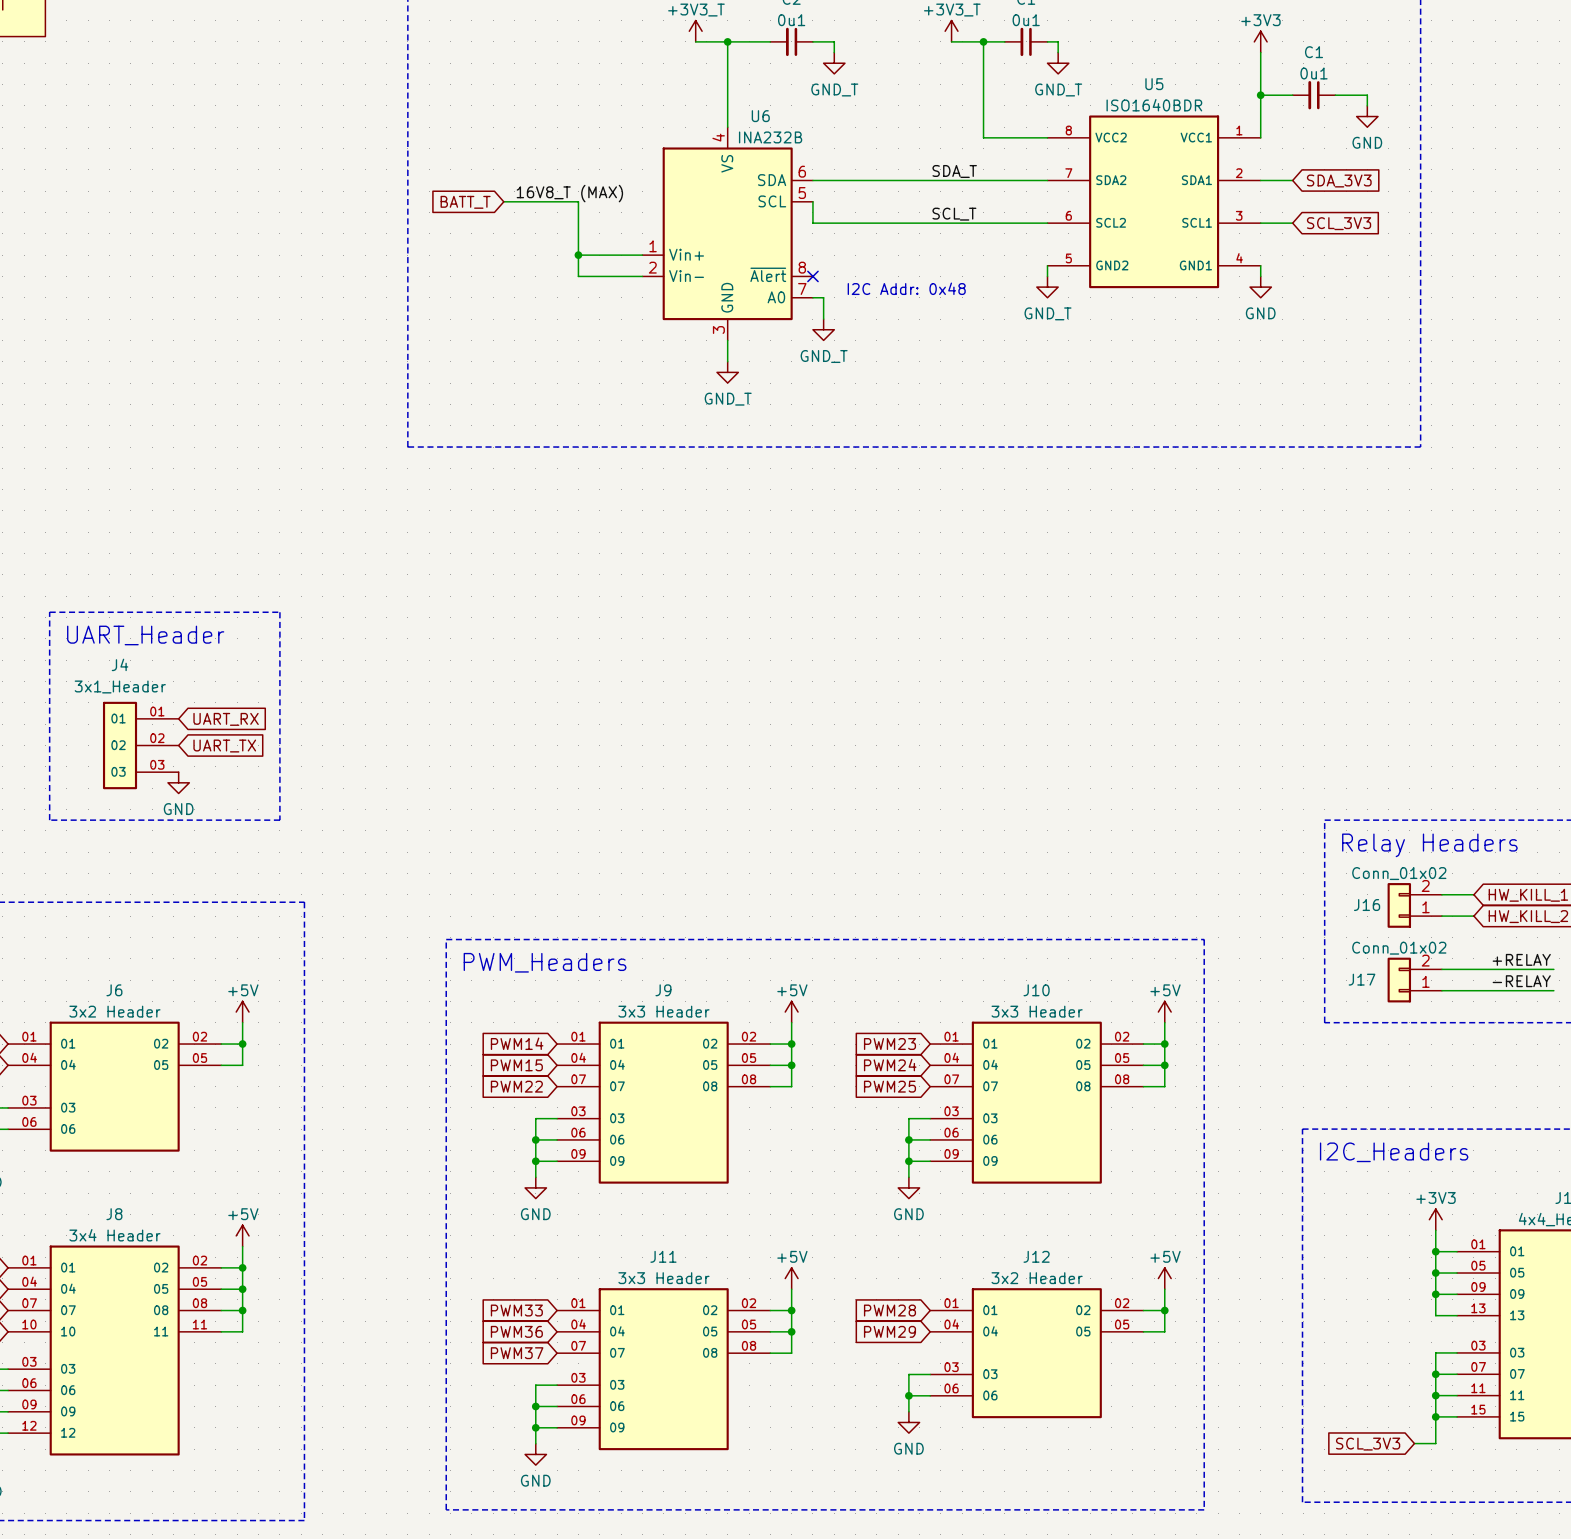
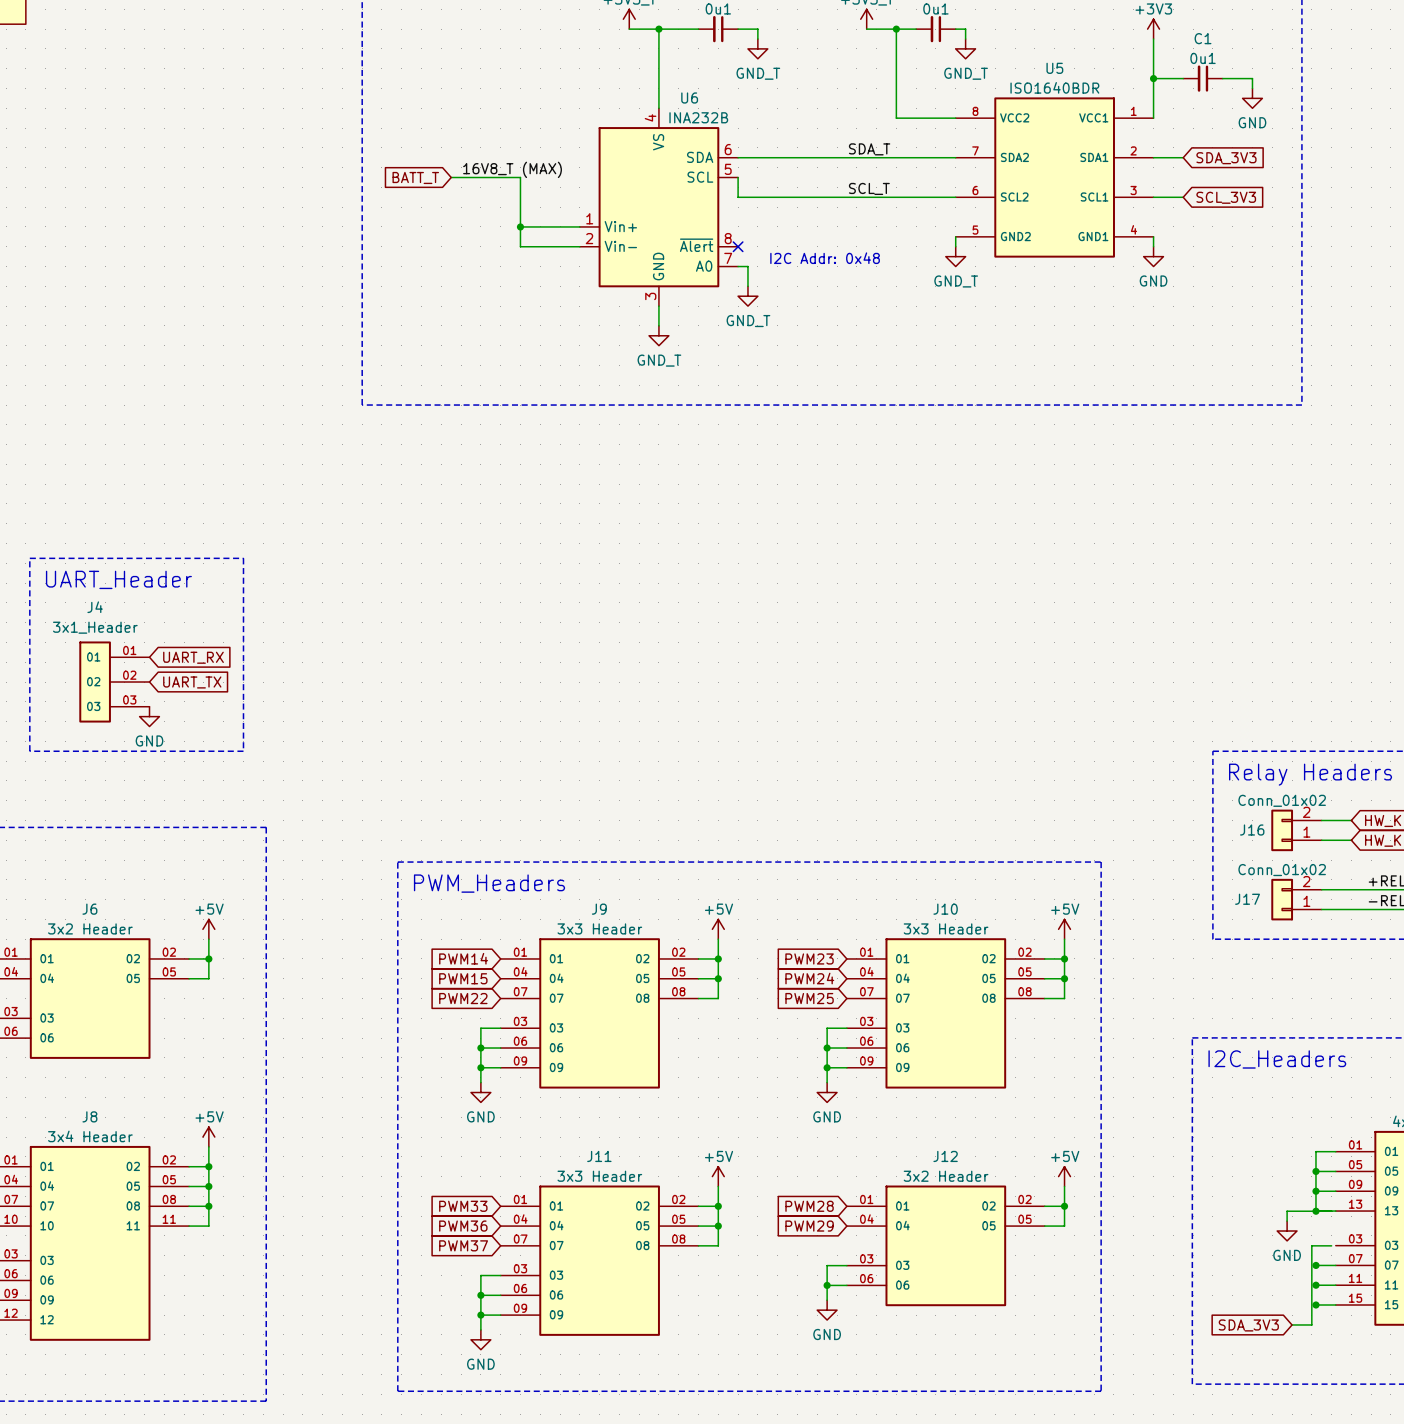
power symbol: +3V3 (1435, 1219) -> none
wire: (1435, 1230) (1435, 1251) -> none
junction: (1435, 1251) -> none
junction: none -> (1315, 1211)
wire: none -> (1331, 1211) (1287, 1211) (1287, 1221)
power symbol: none -> GND (1287, 1231)
wire: (1457, 1352) (1435, 1352) (1435, 1443) (1414, 1443) -> none
wire: none -> (1331, 1245) (1311, 1245) (1311, 1324) (1292, 1324)
global label: SCL_3V3 (1368, 1444) -> SDA_3V3 (1248, 1325)

